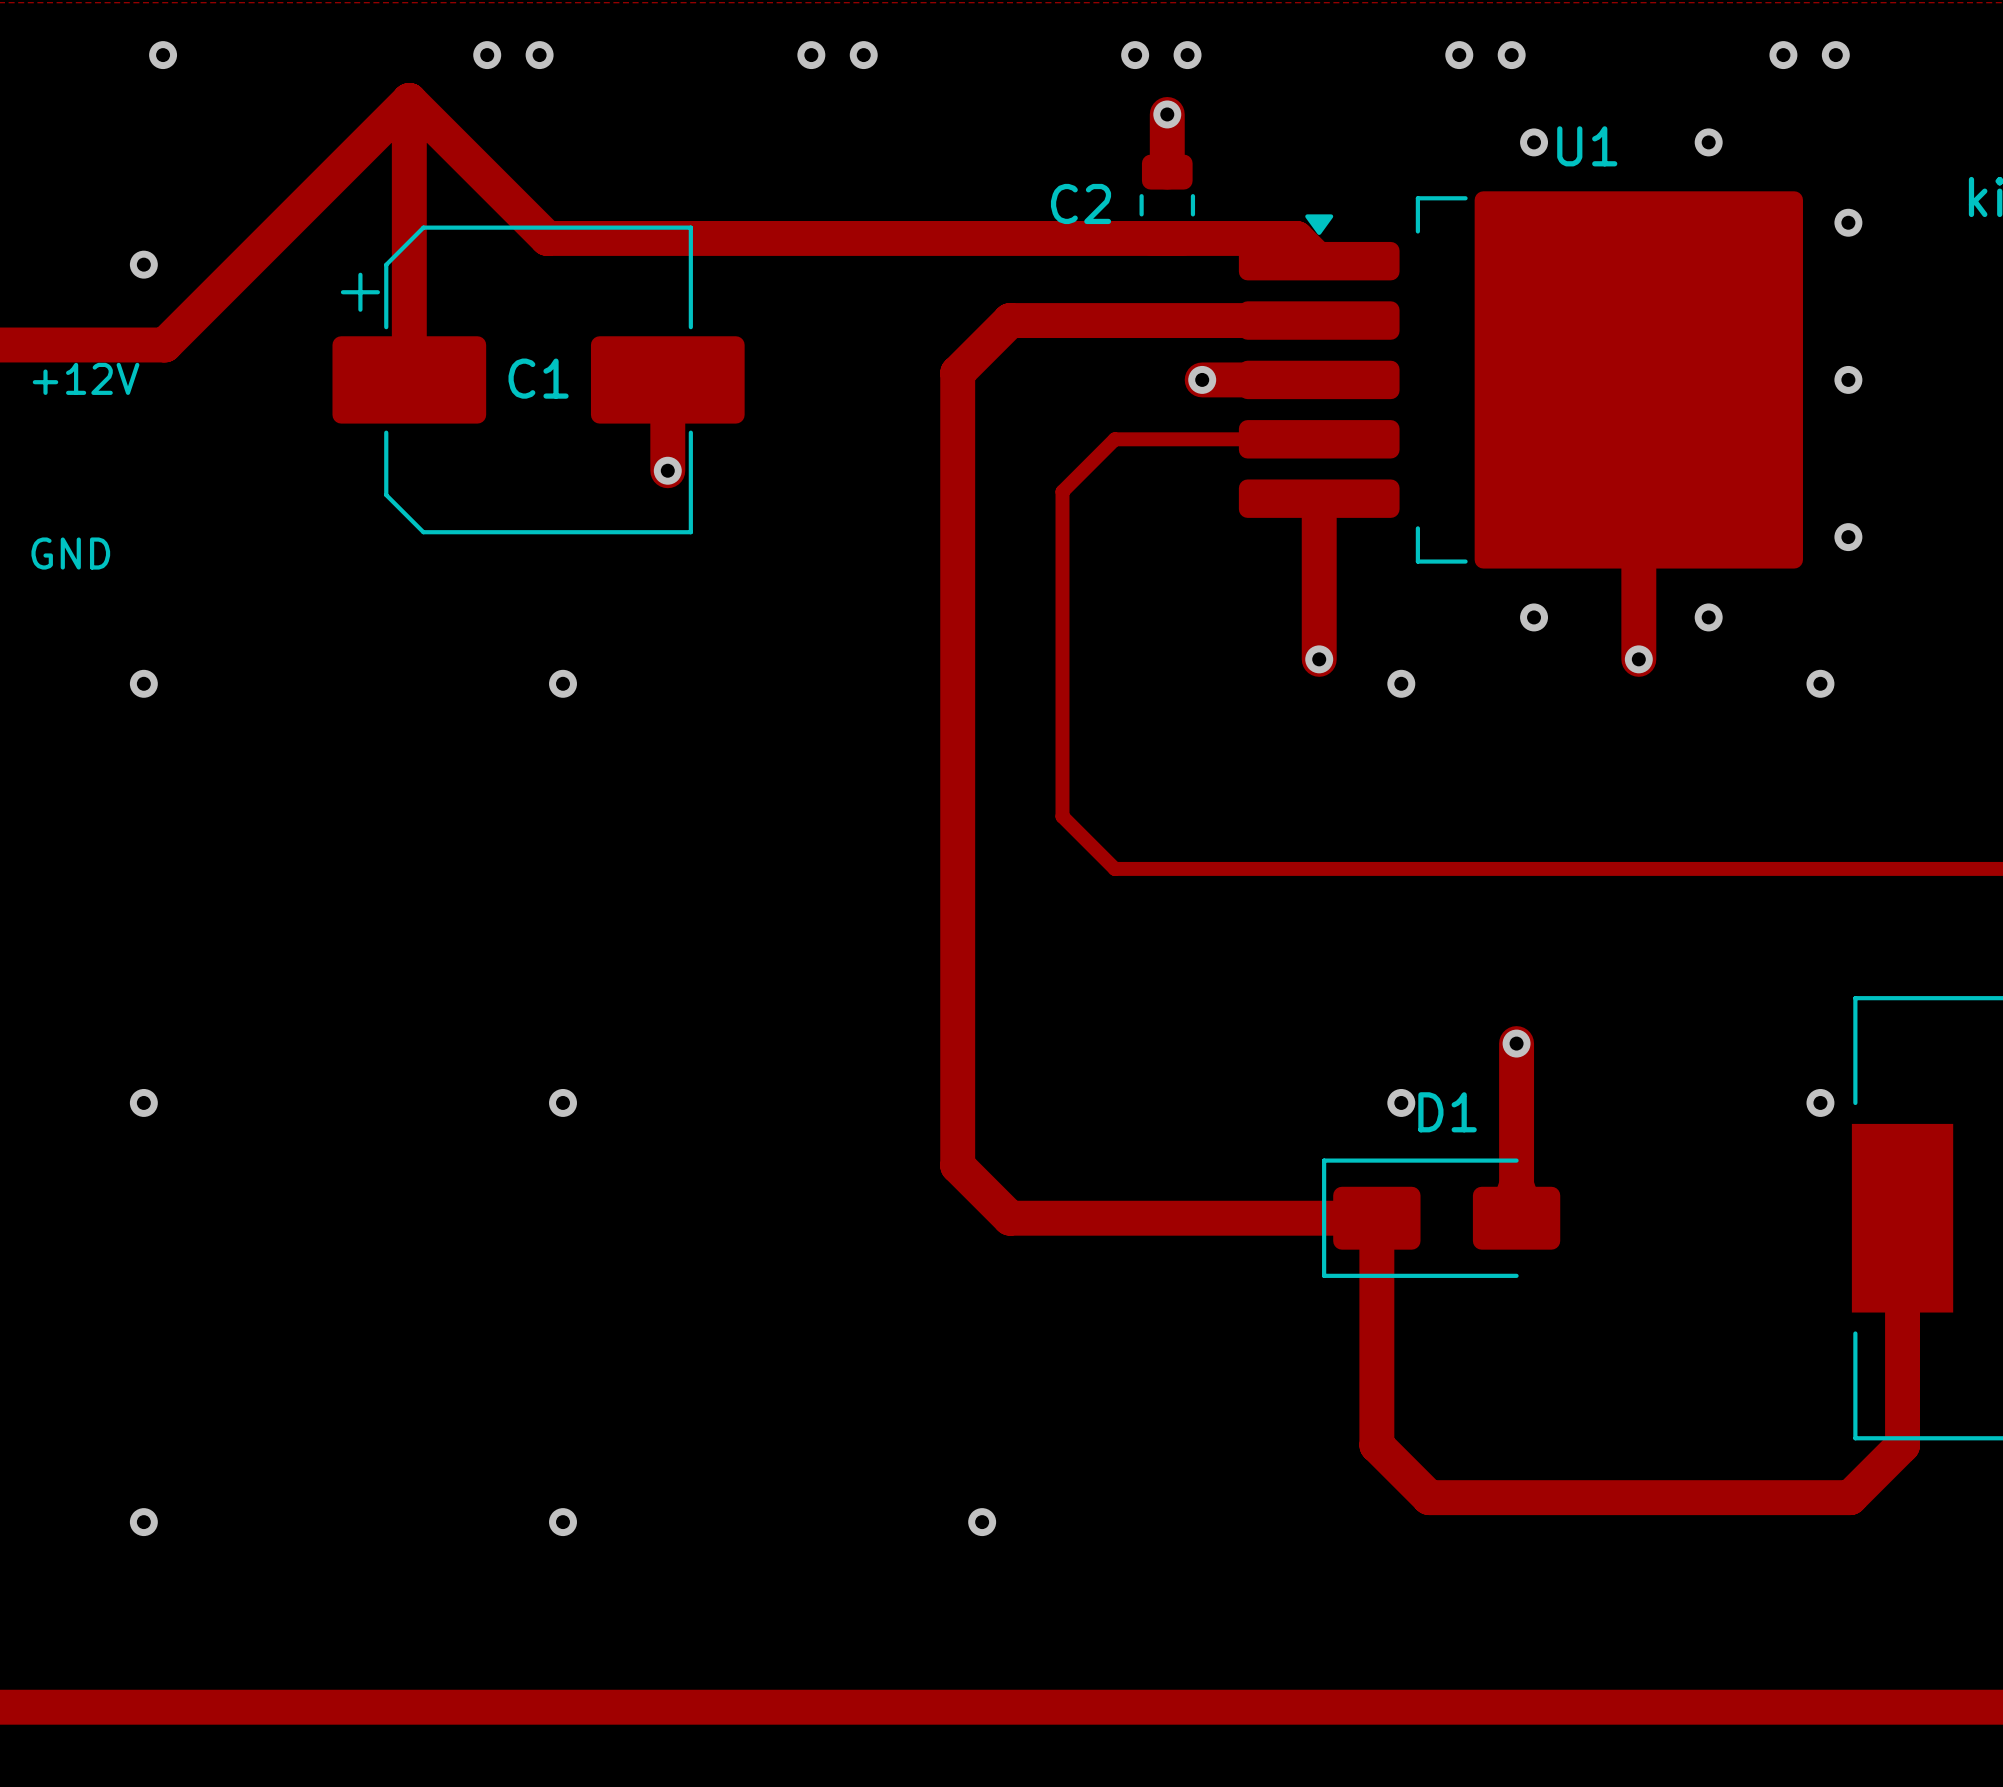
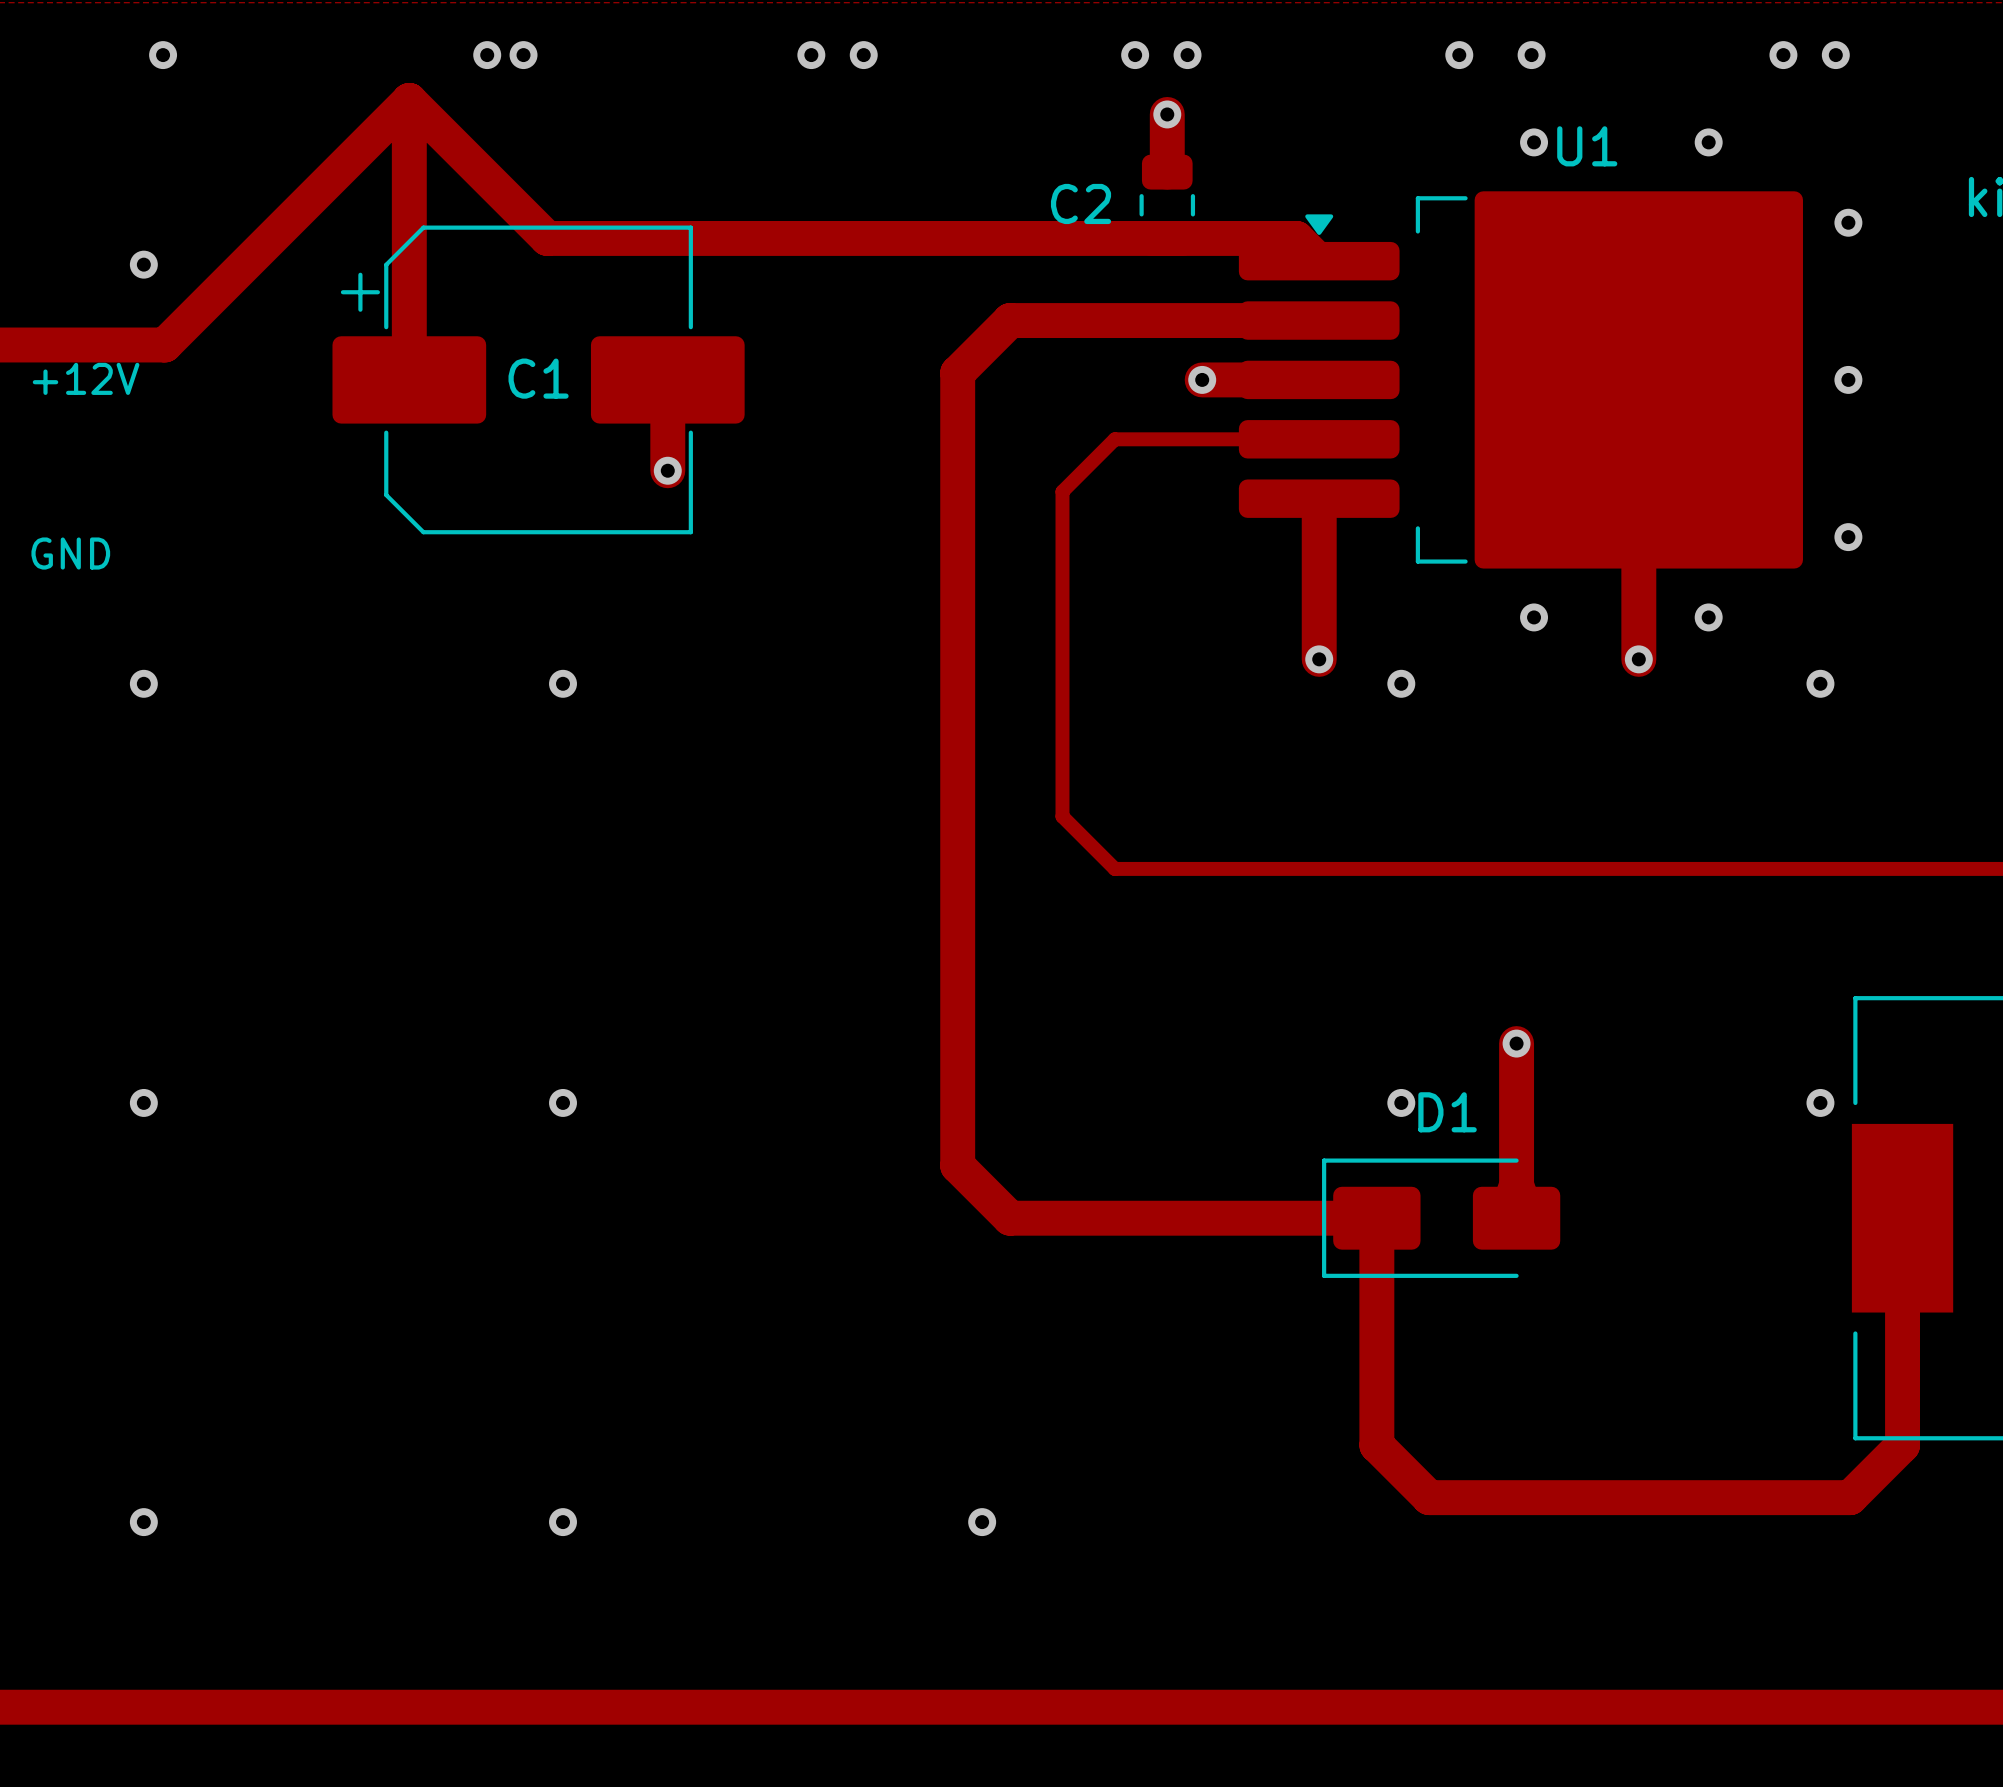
via position: (539, 55) -> (523, 55)
via position: (1511, 55) -> (1531, 55)

